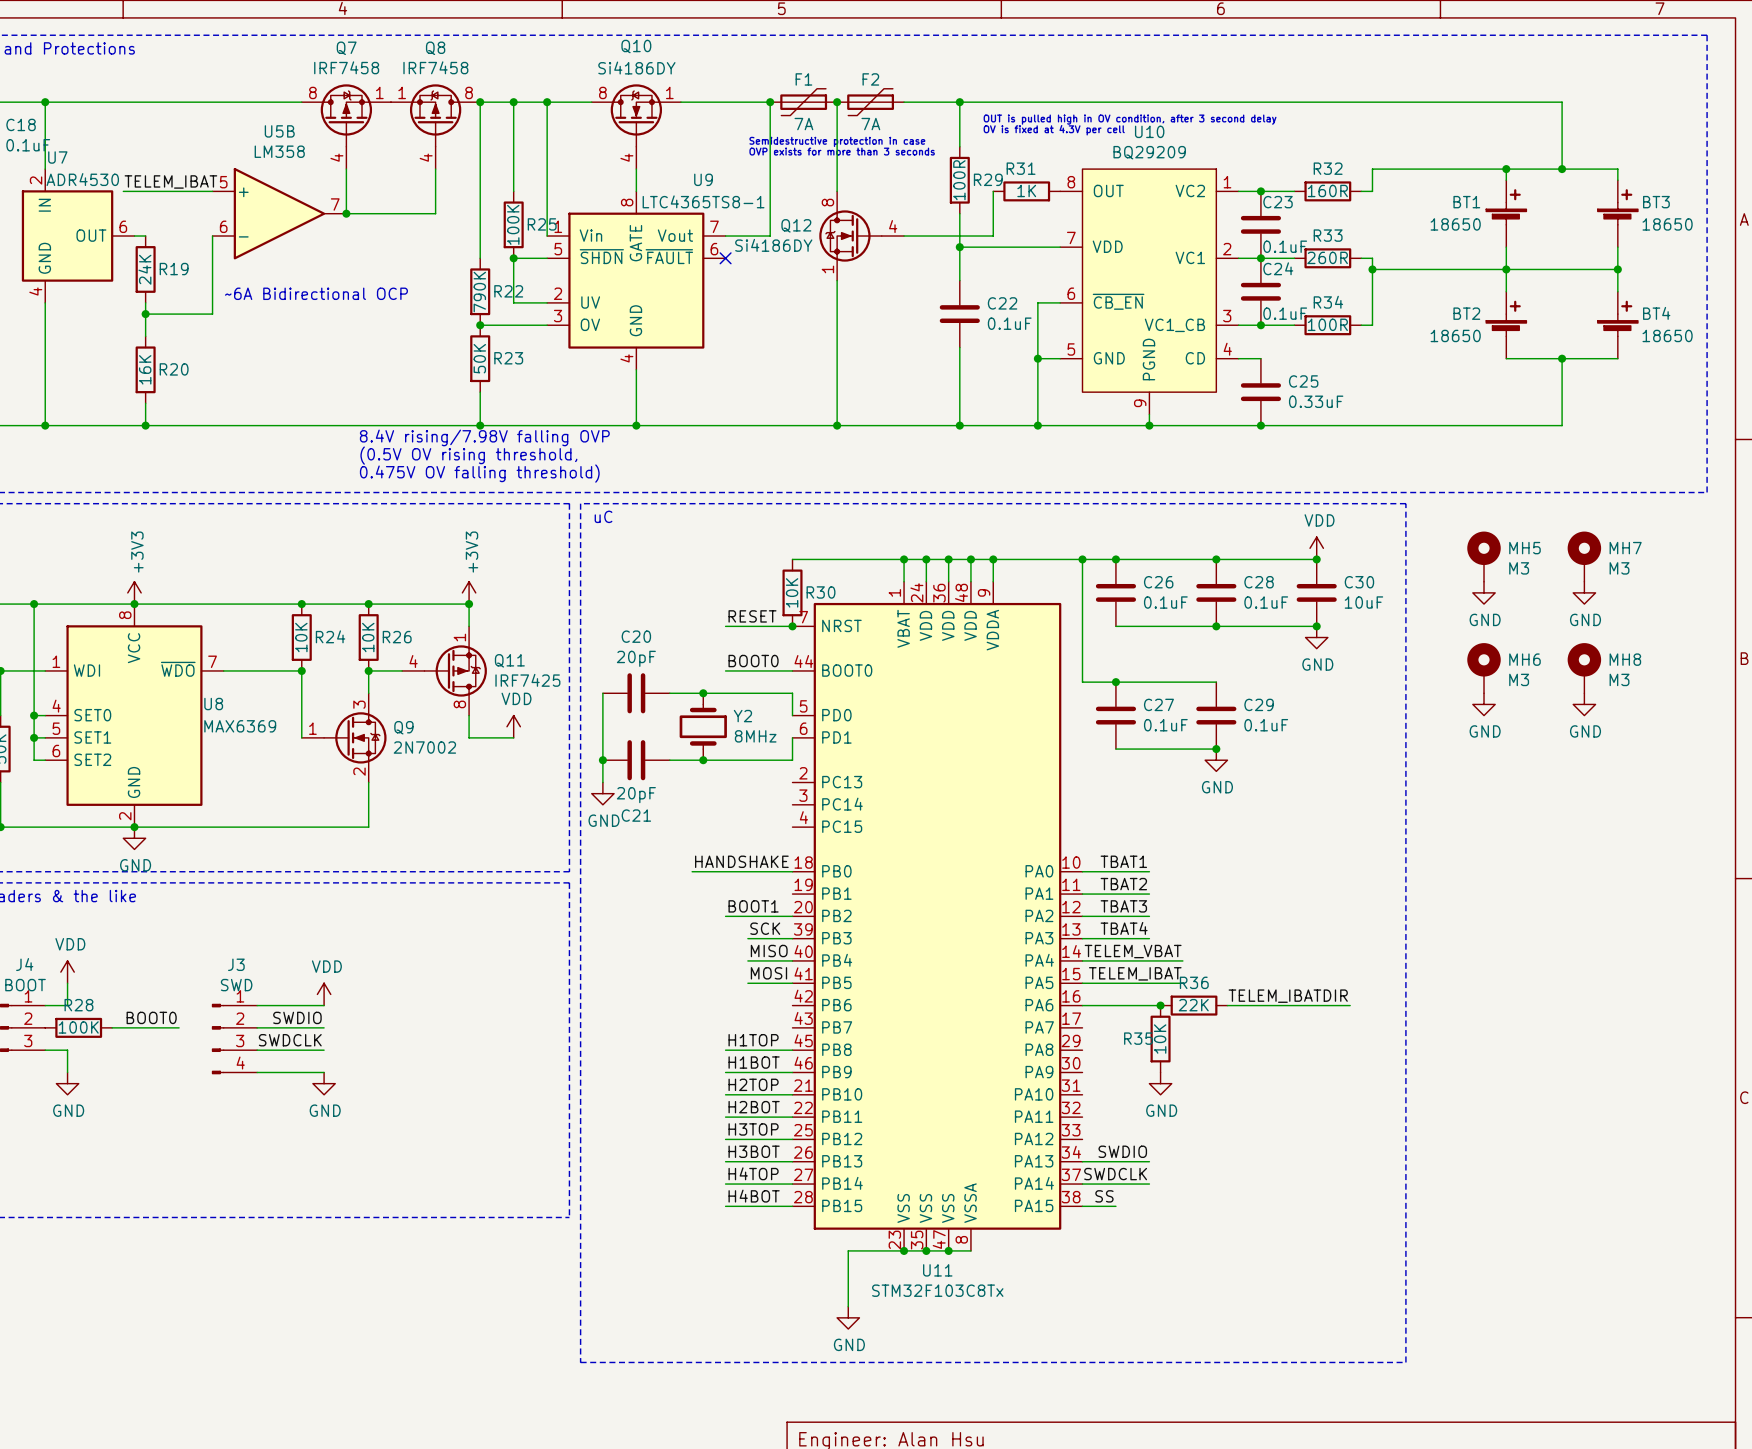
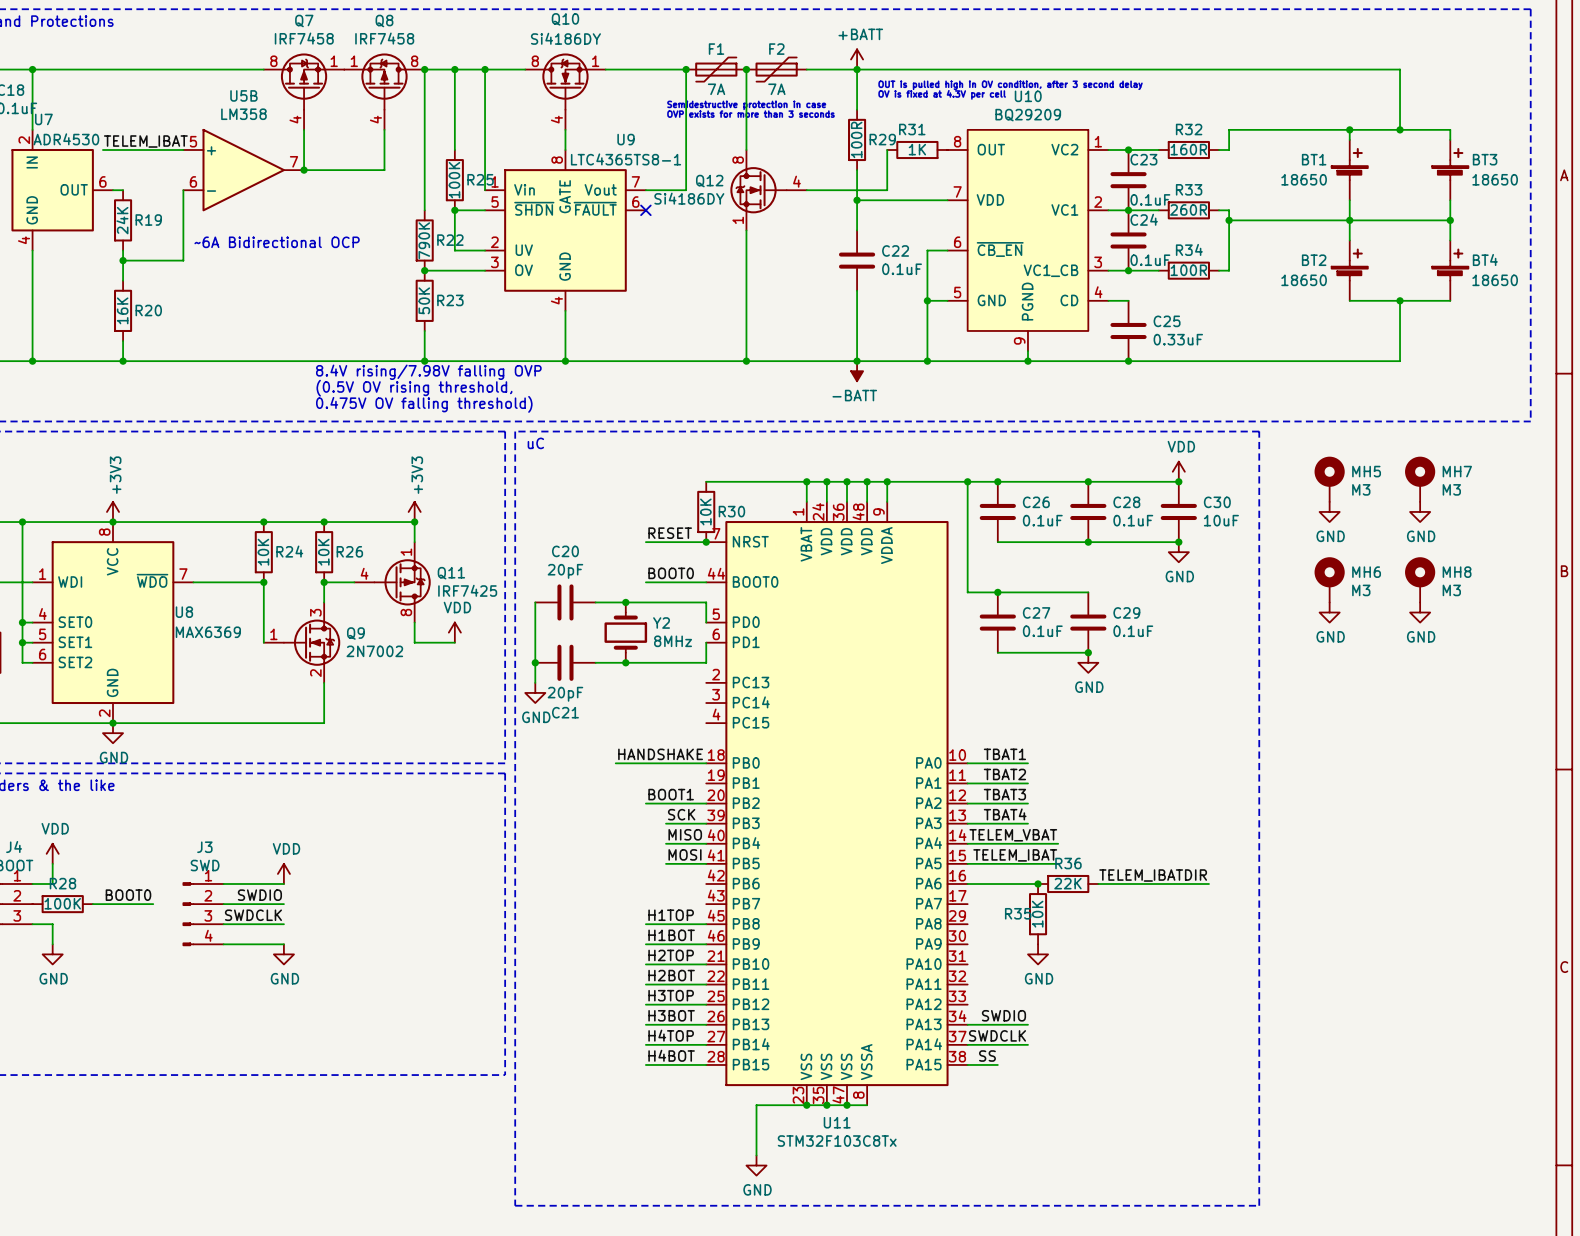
power symbol: none -> +BATT (857, 59)
power symbol: none -> -BATT (857, 371)

